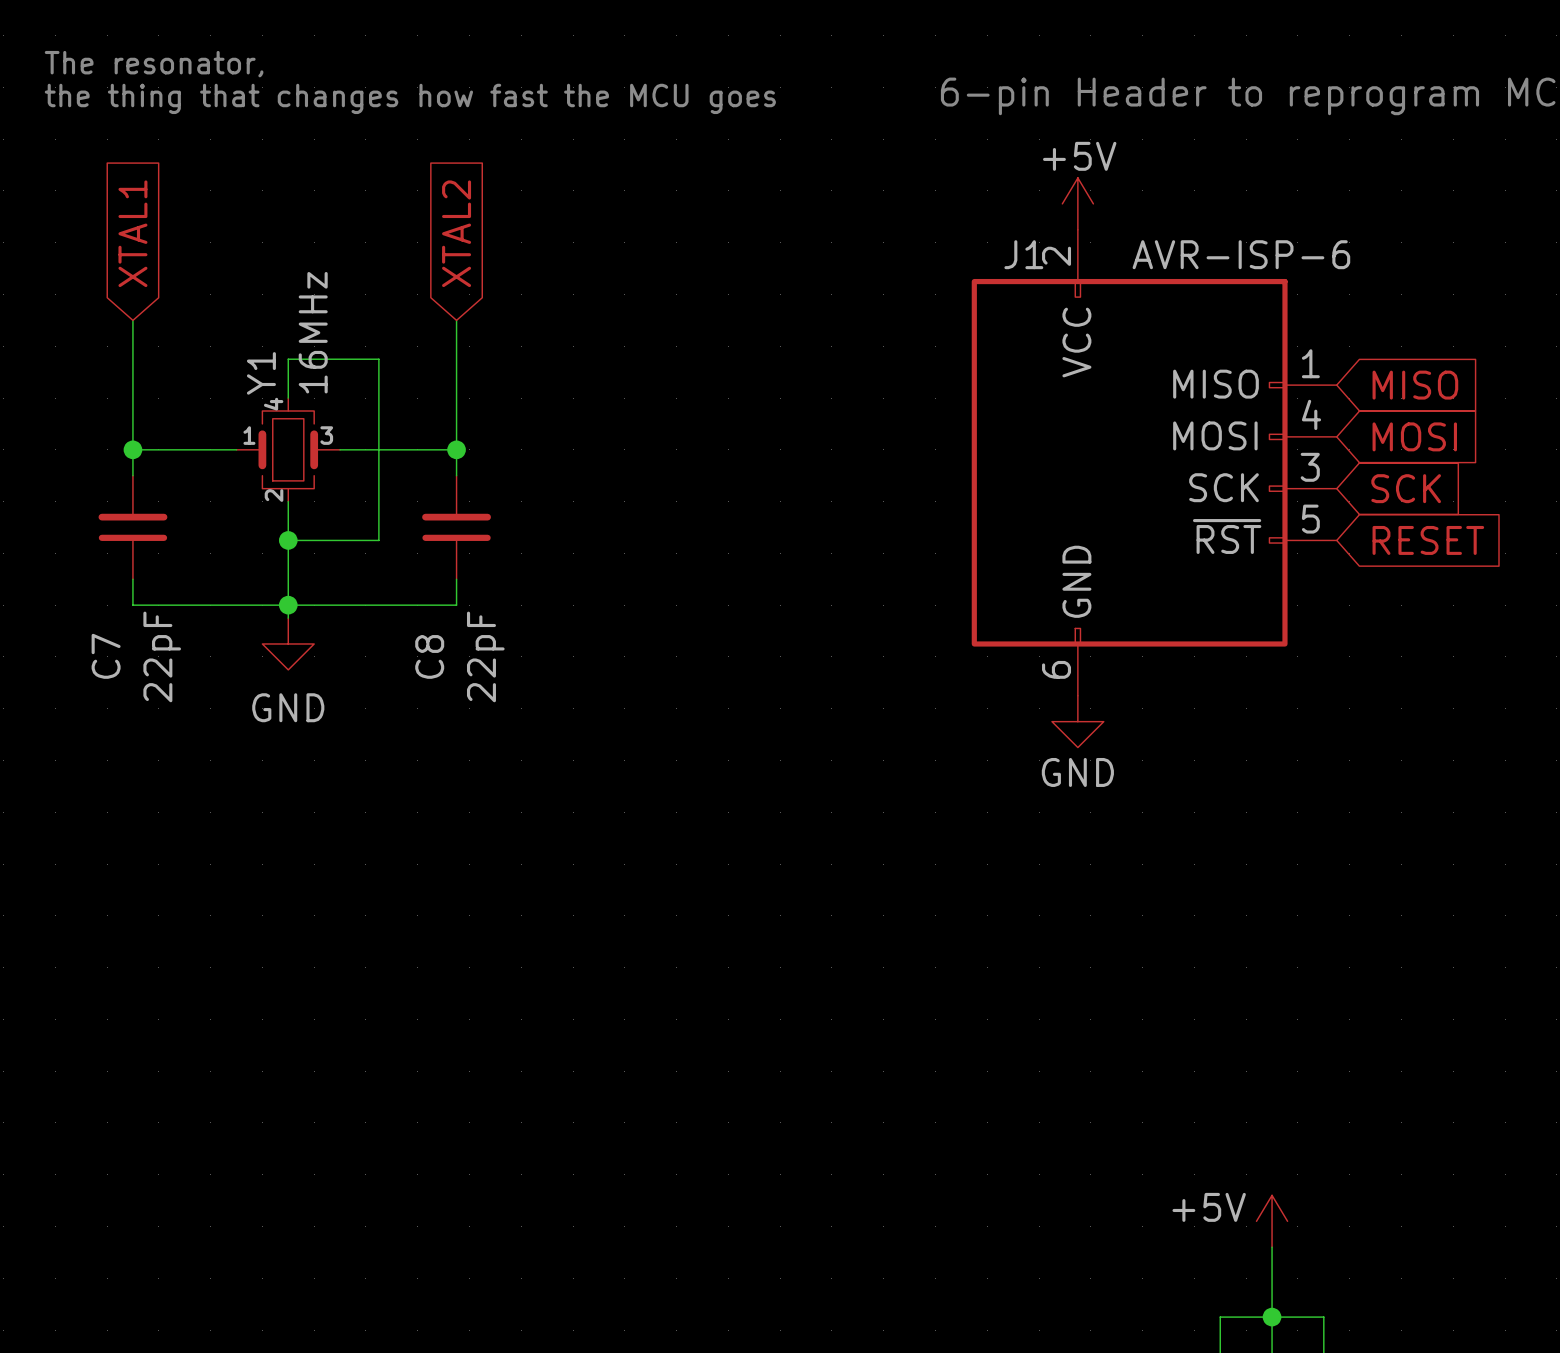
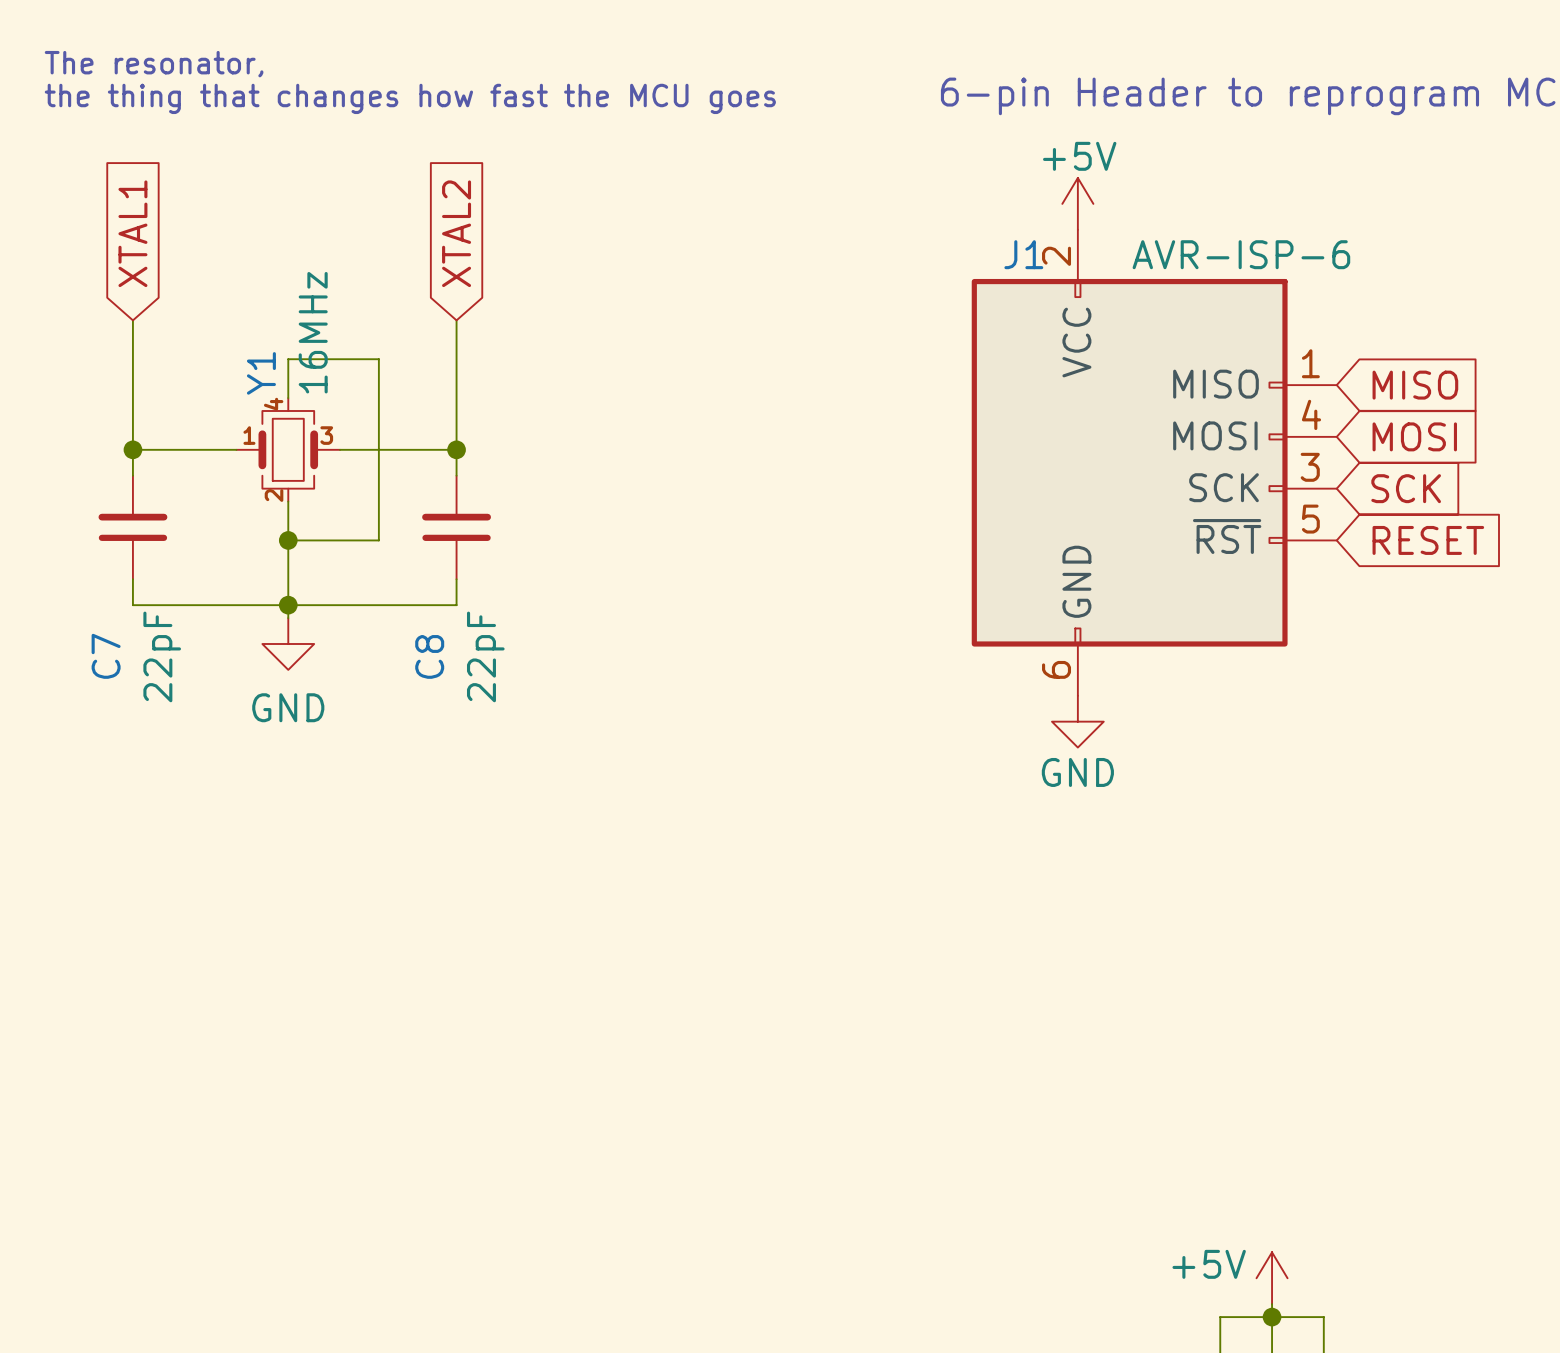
power symbol position: +5V (1272, 1221) -> +5V (1272, 1278)

